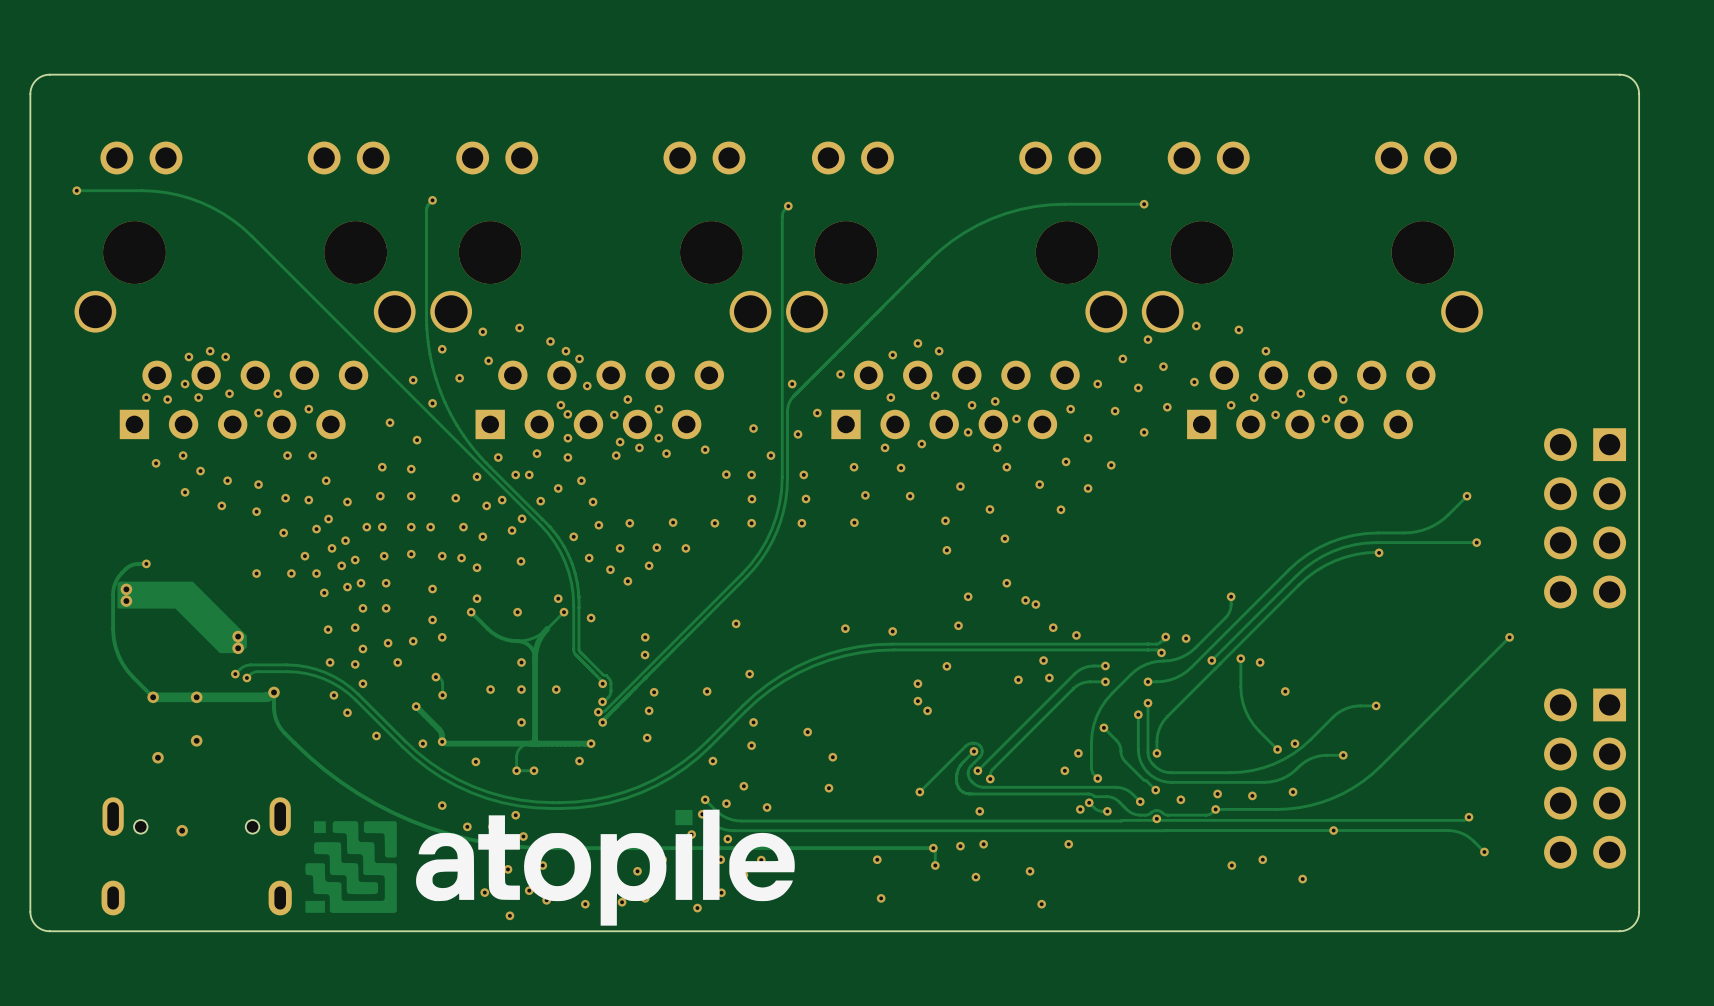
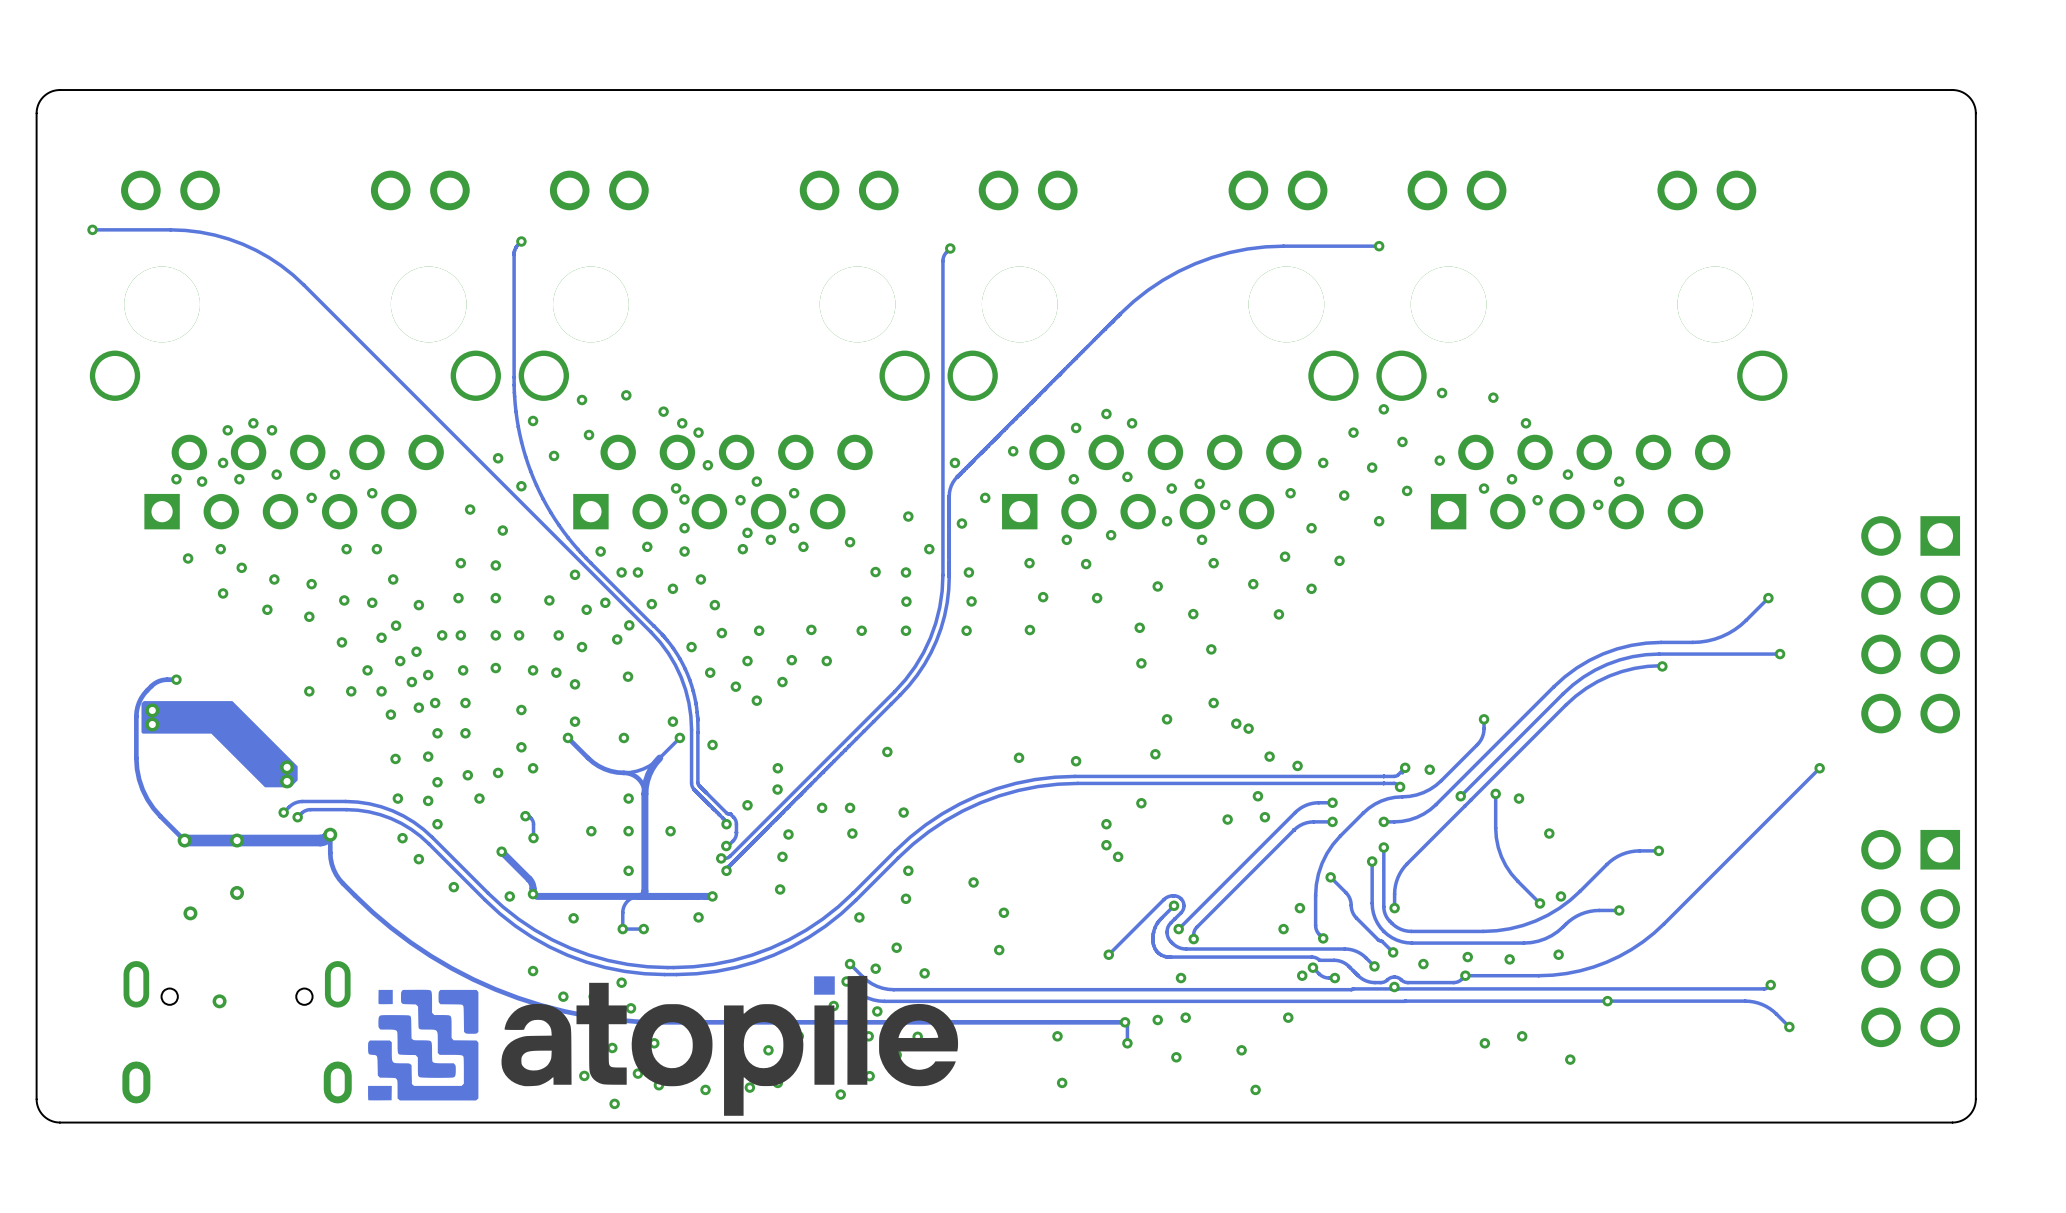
via: none -> (747, 805)
via: none -> (822, 807)
via: none -> (850, 807)

